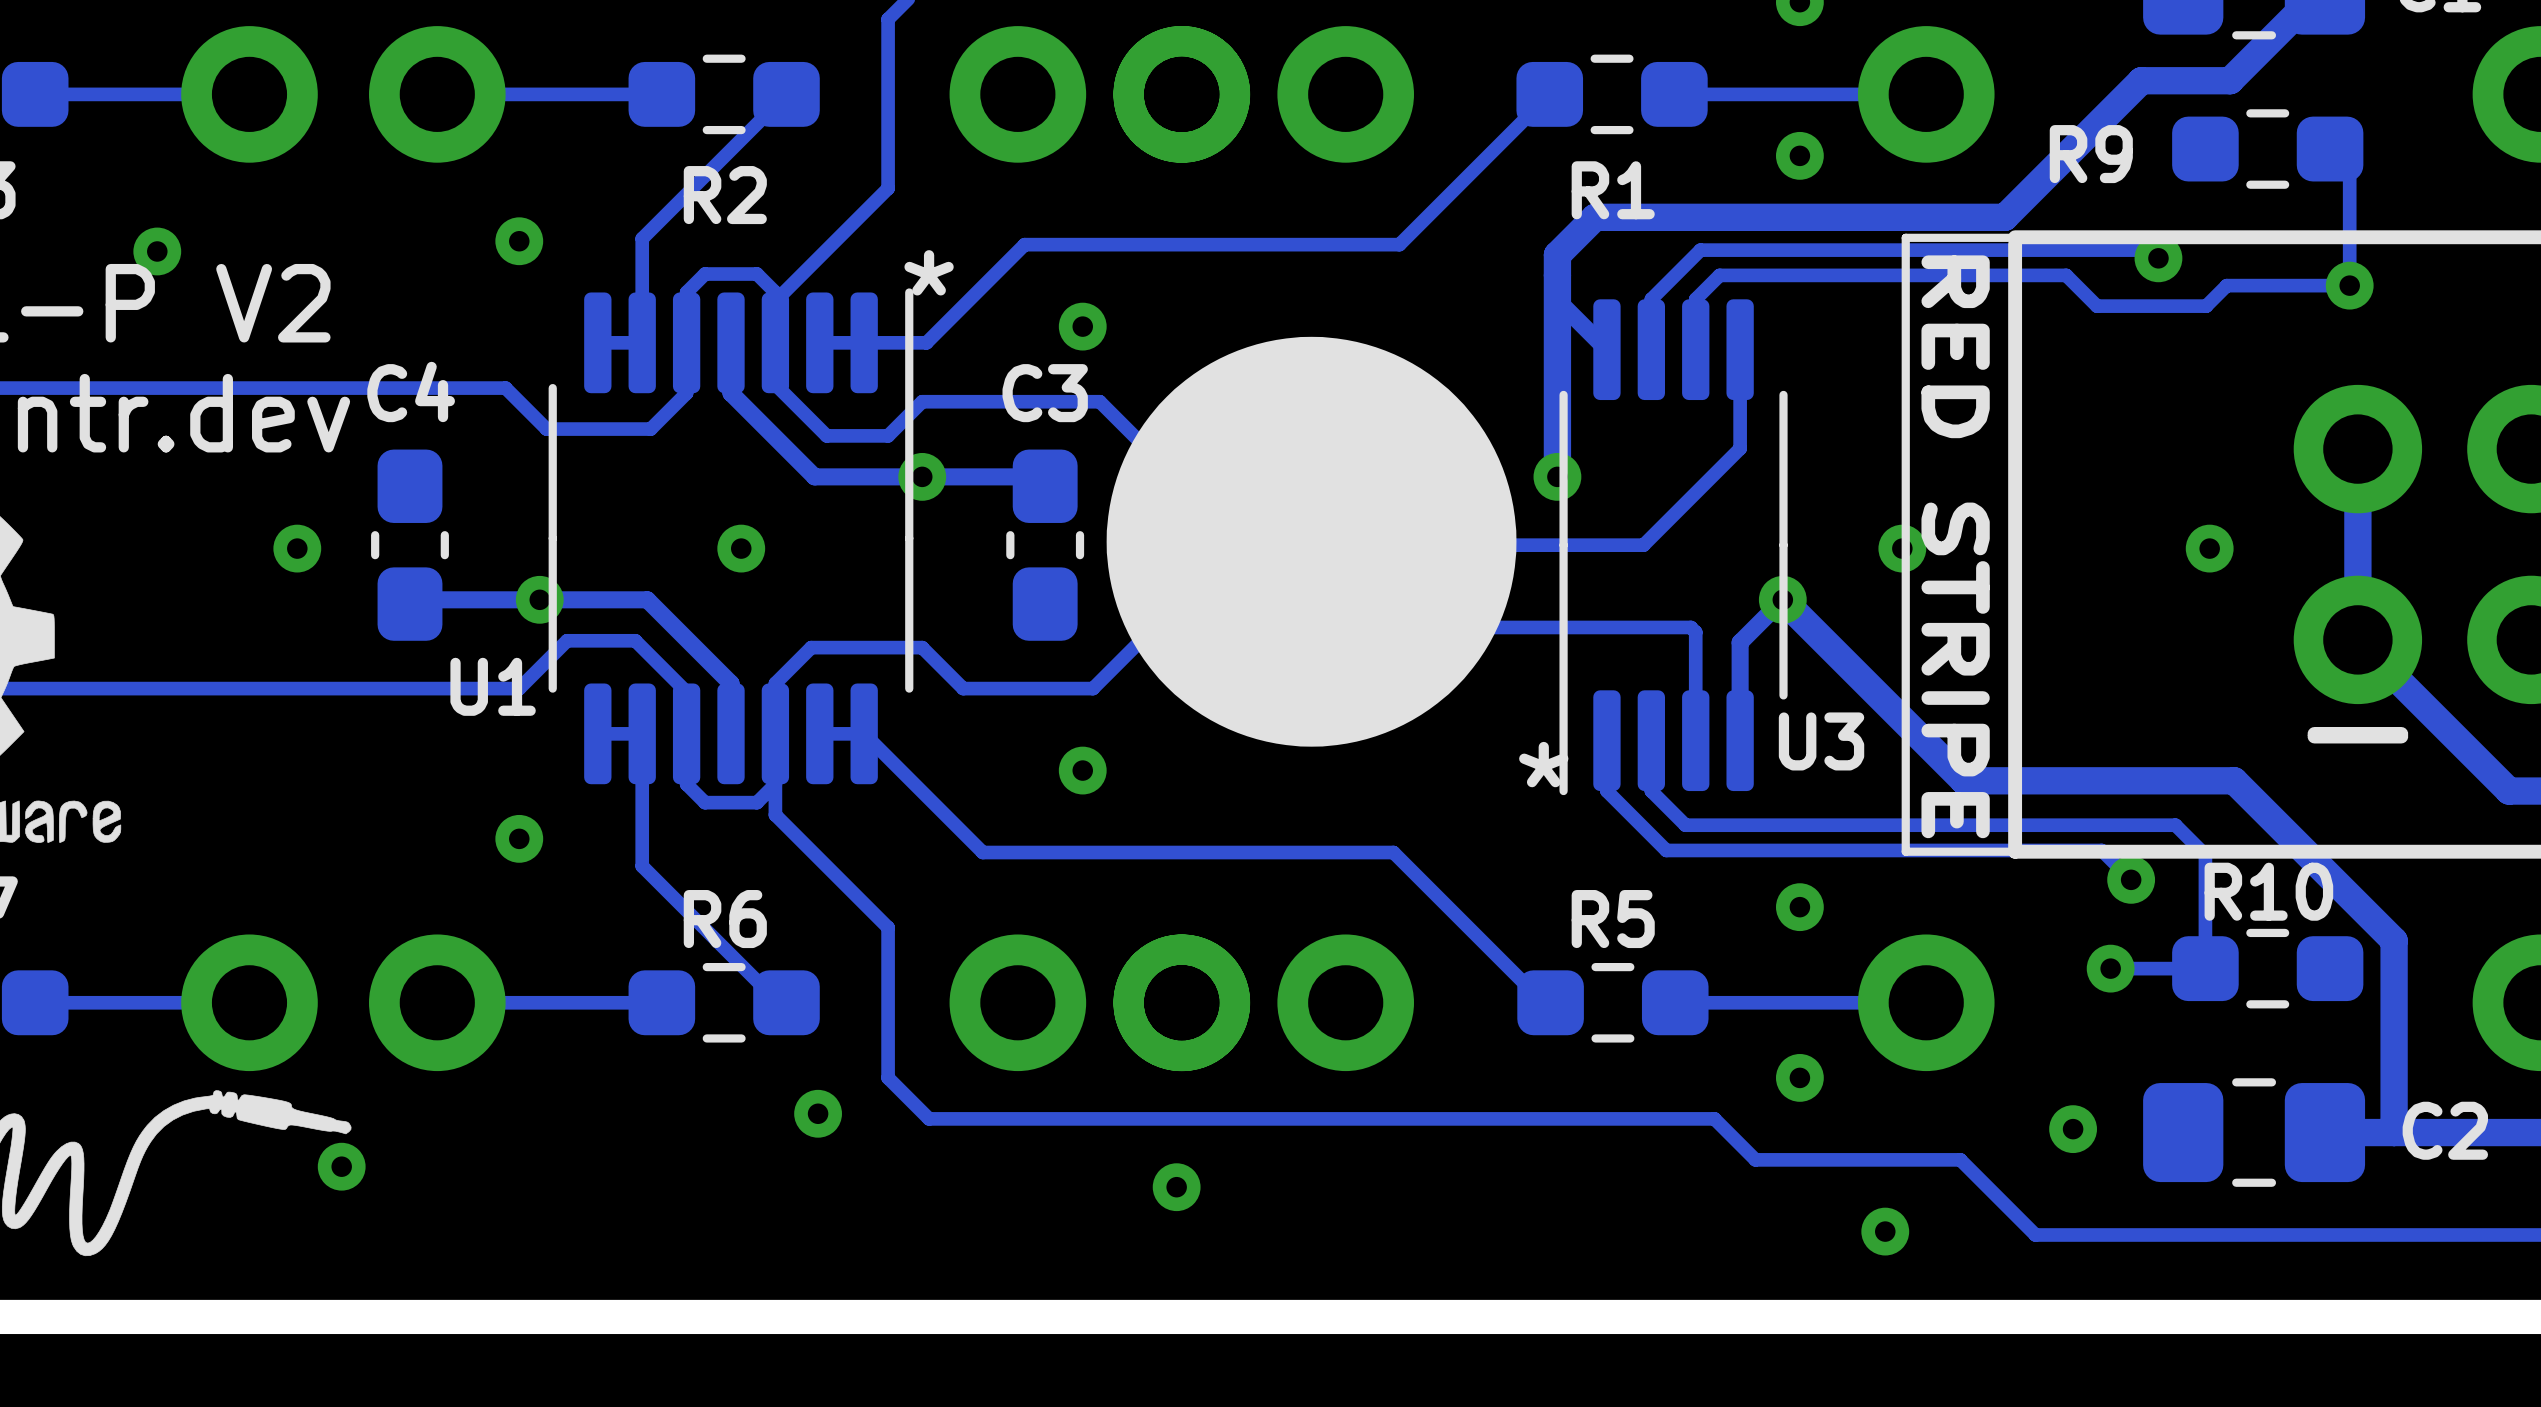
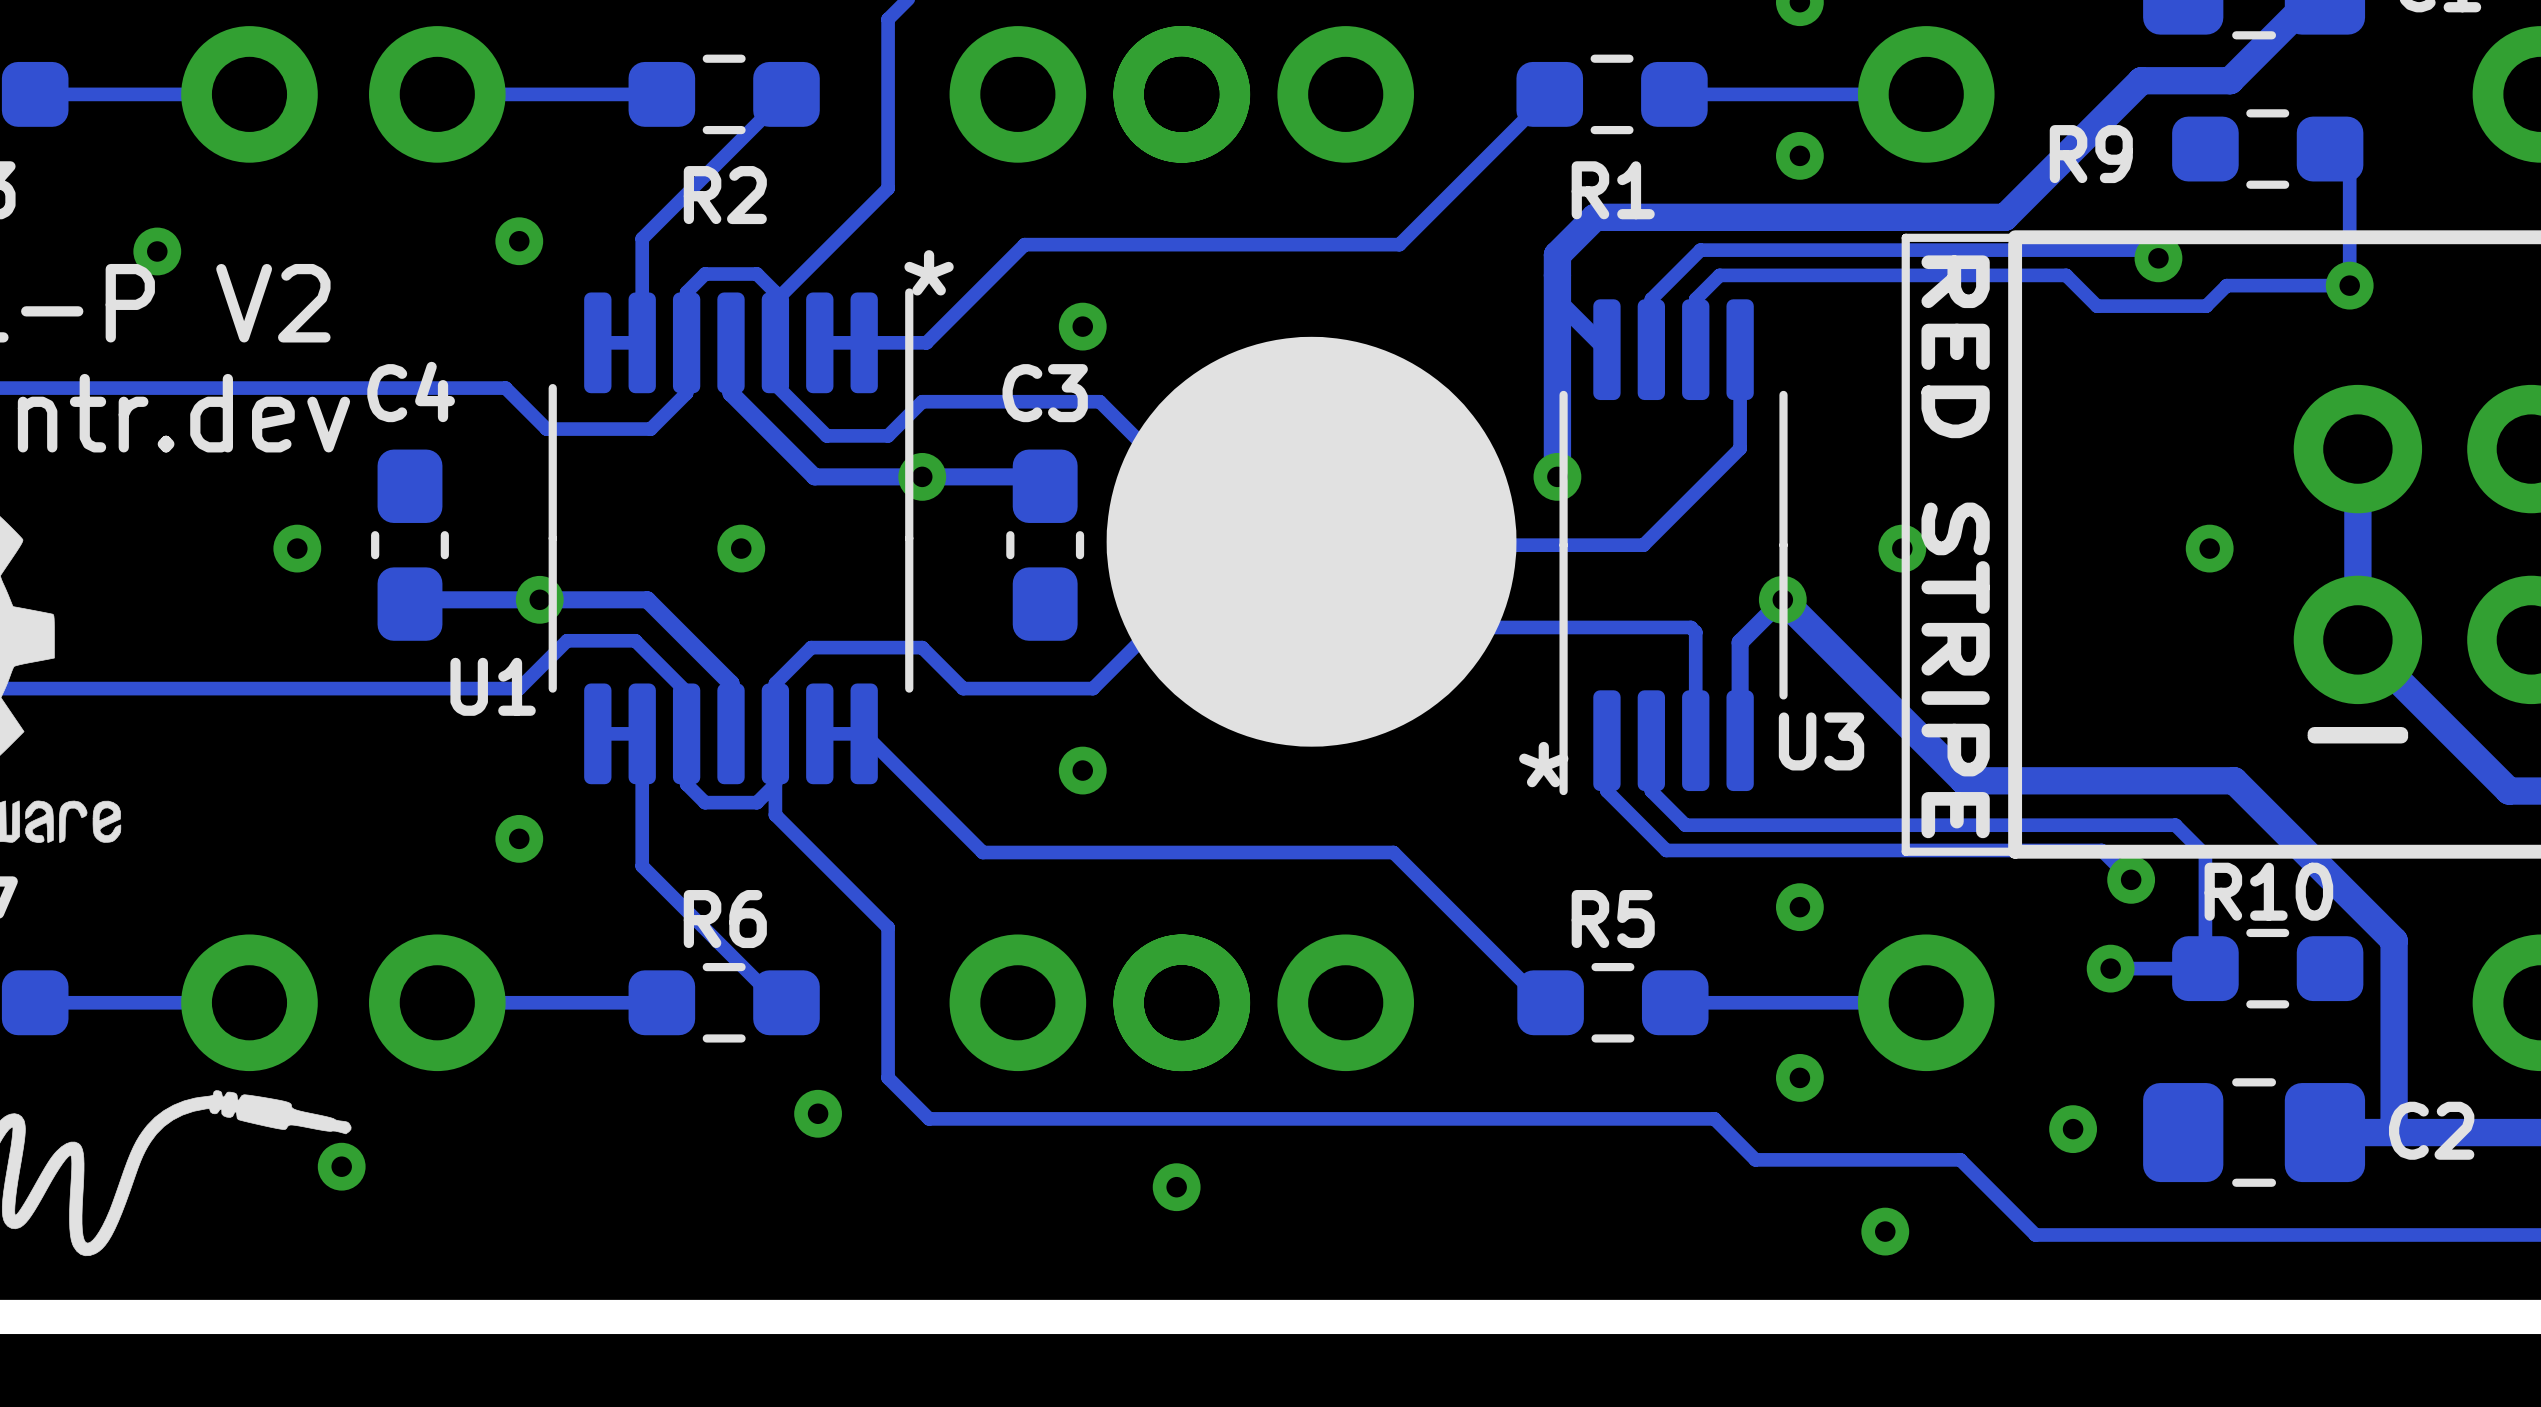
C2 name position: C2 (2445, 1130) -> C2 (2431, 1130)

